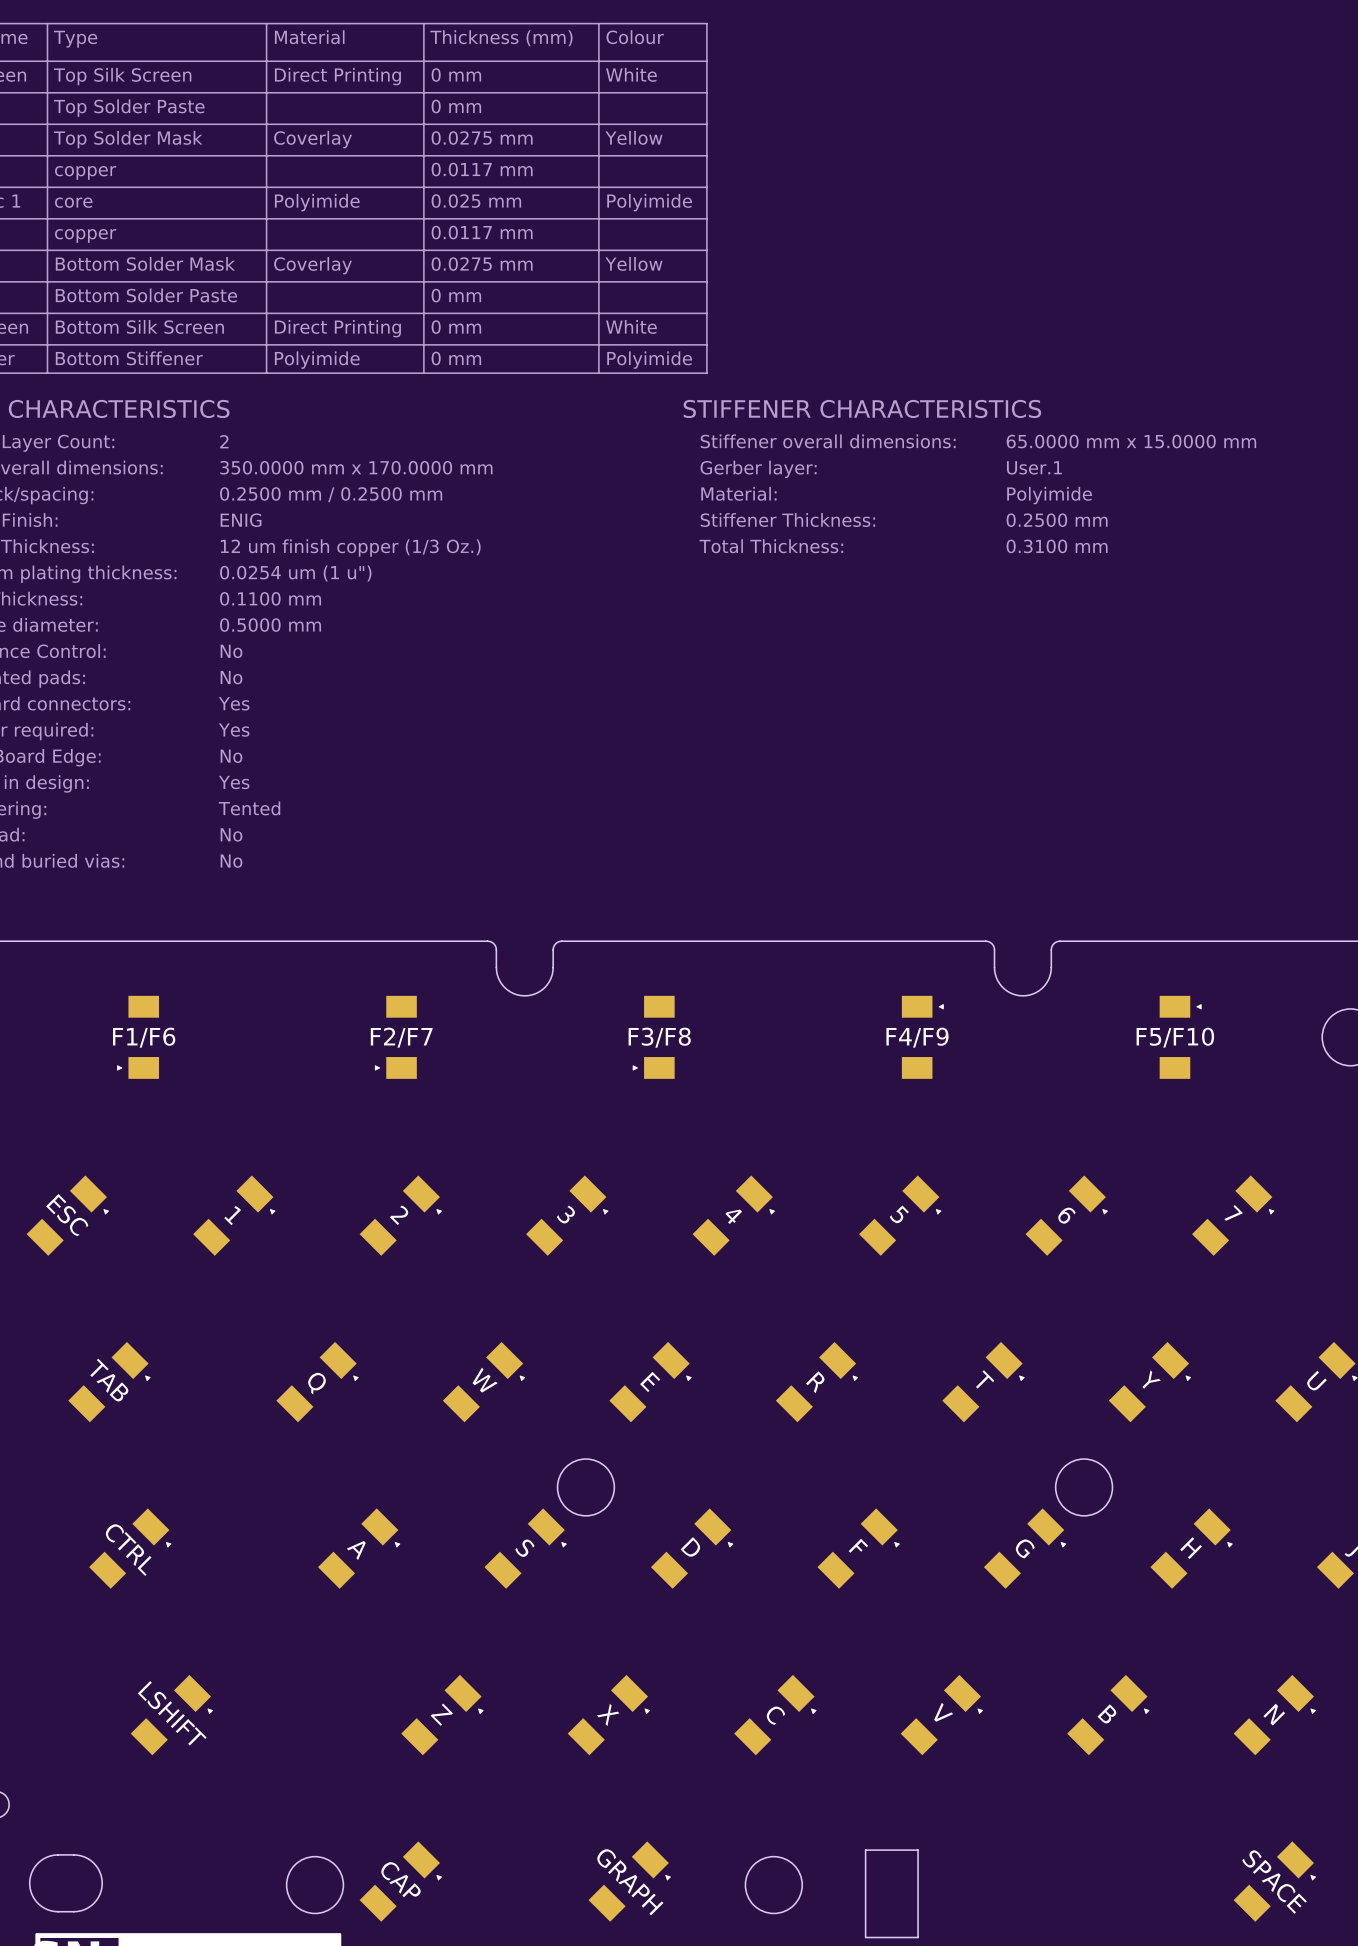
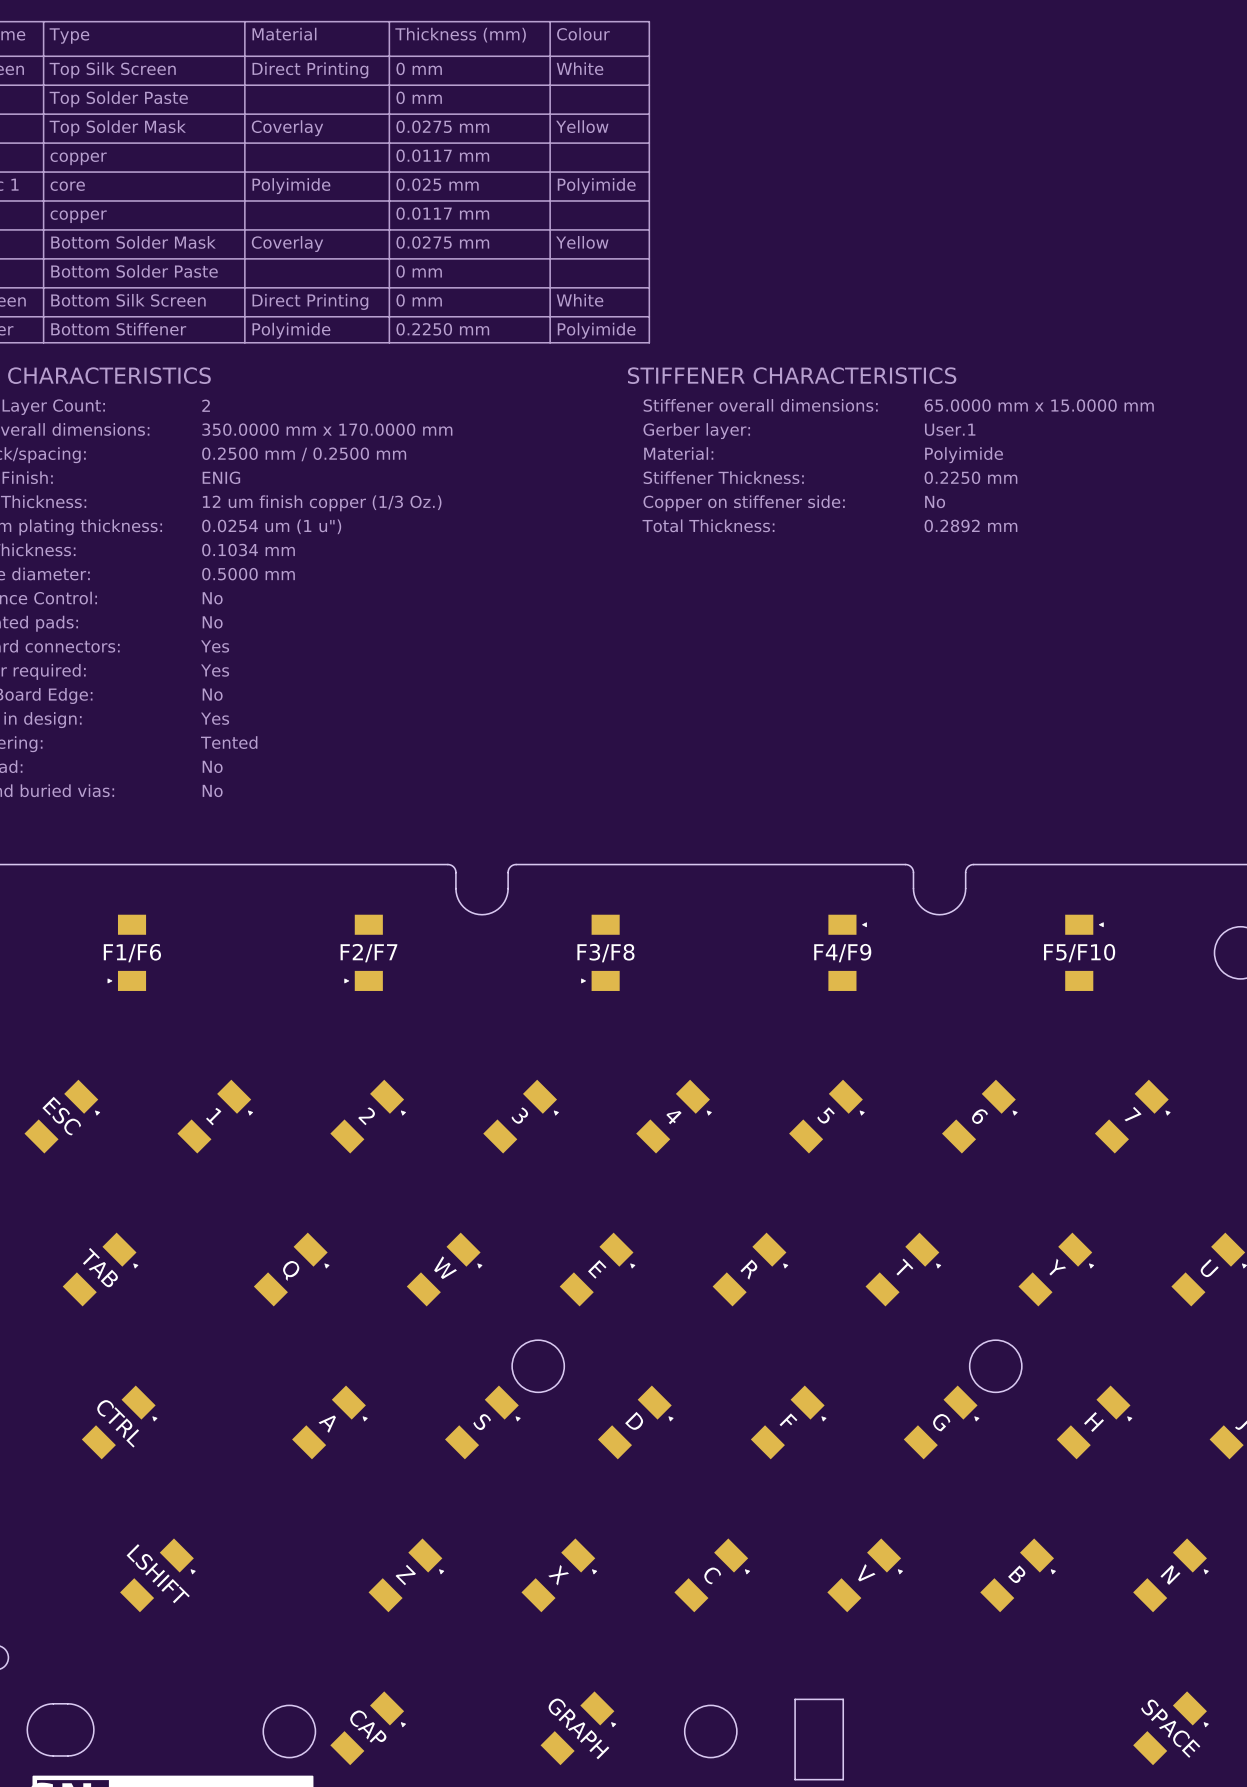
text: 0 mm (456, 358) -> 0.2250 mm (442, 329)
text: 0.2500 mm (1057, 520) -> 0.2250 mm (970, 477)
text: Total Thickness: (771, 546) -> Copper on stiffener side: (744, 503)
text: 0.3100 mm (1057, 546) -> No (935, 502)
text: none -> Total Thickness: (708, 525)
text: none -> 0.2892 mm (970, 525)
text: 0.1100 mm (270, 598) -> 0.1034 mm (248, 550)

